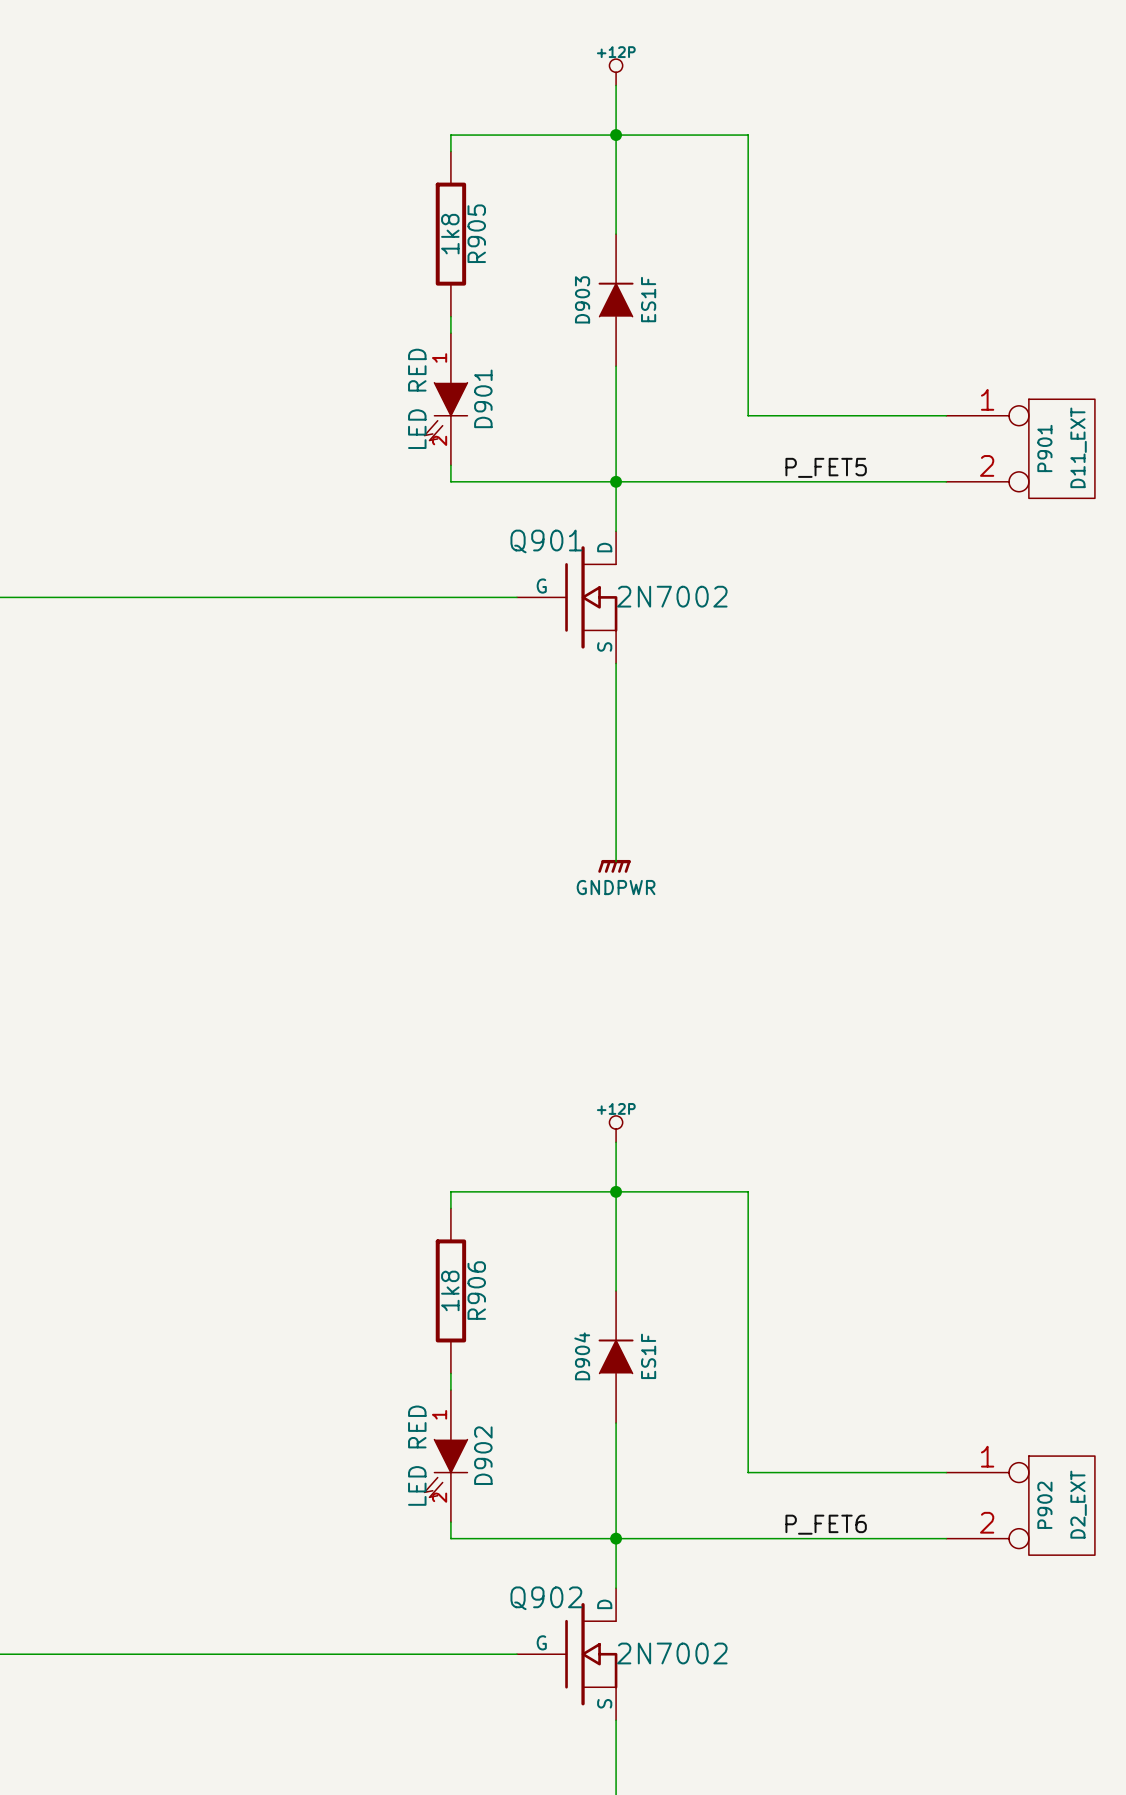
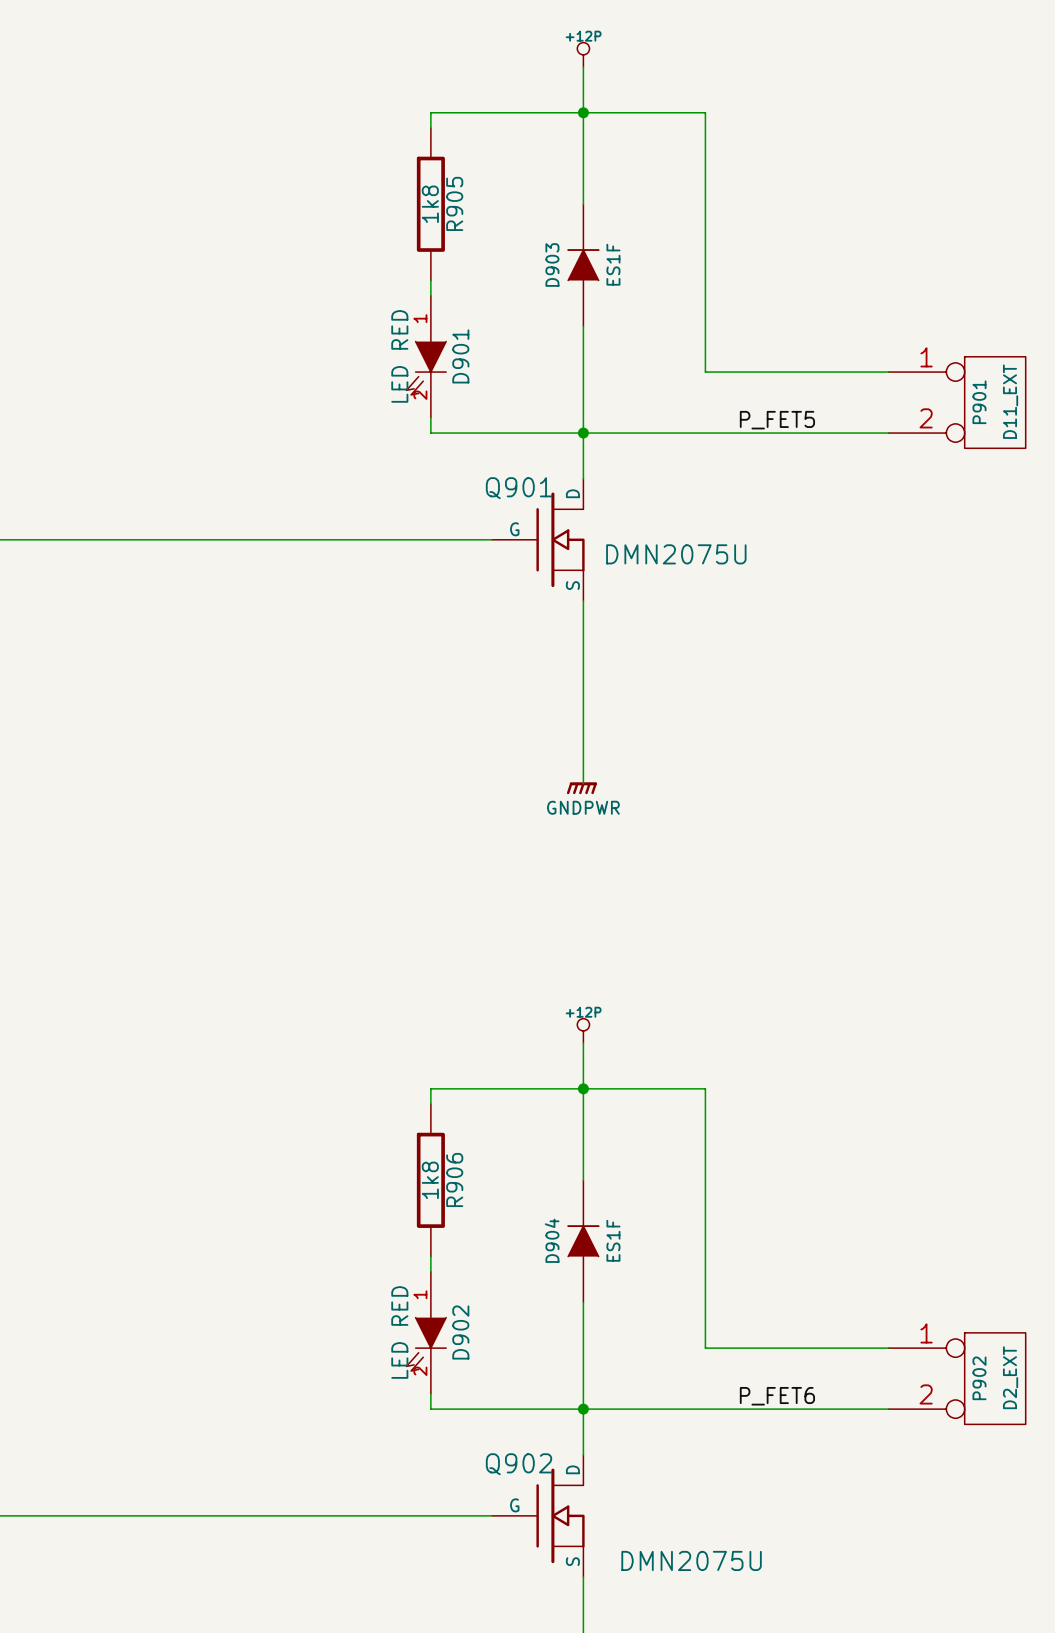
Q901 value: 2N7002 (672, 596) -> DMN2075U (676, 554)
Q902 value: 2N7002 (672, 1653) -> DMN2075U (691, 1560)

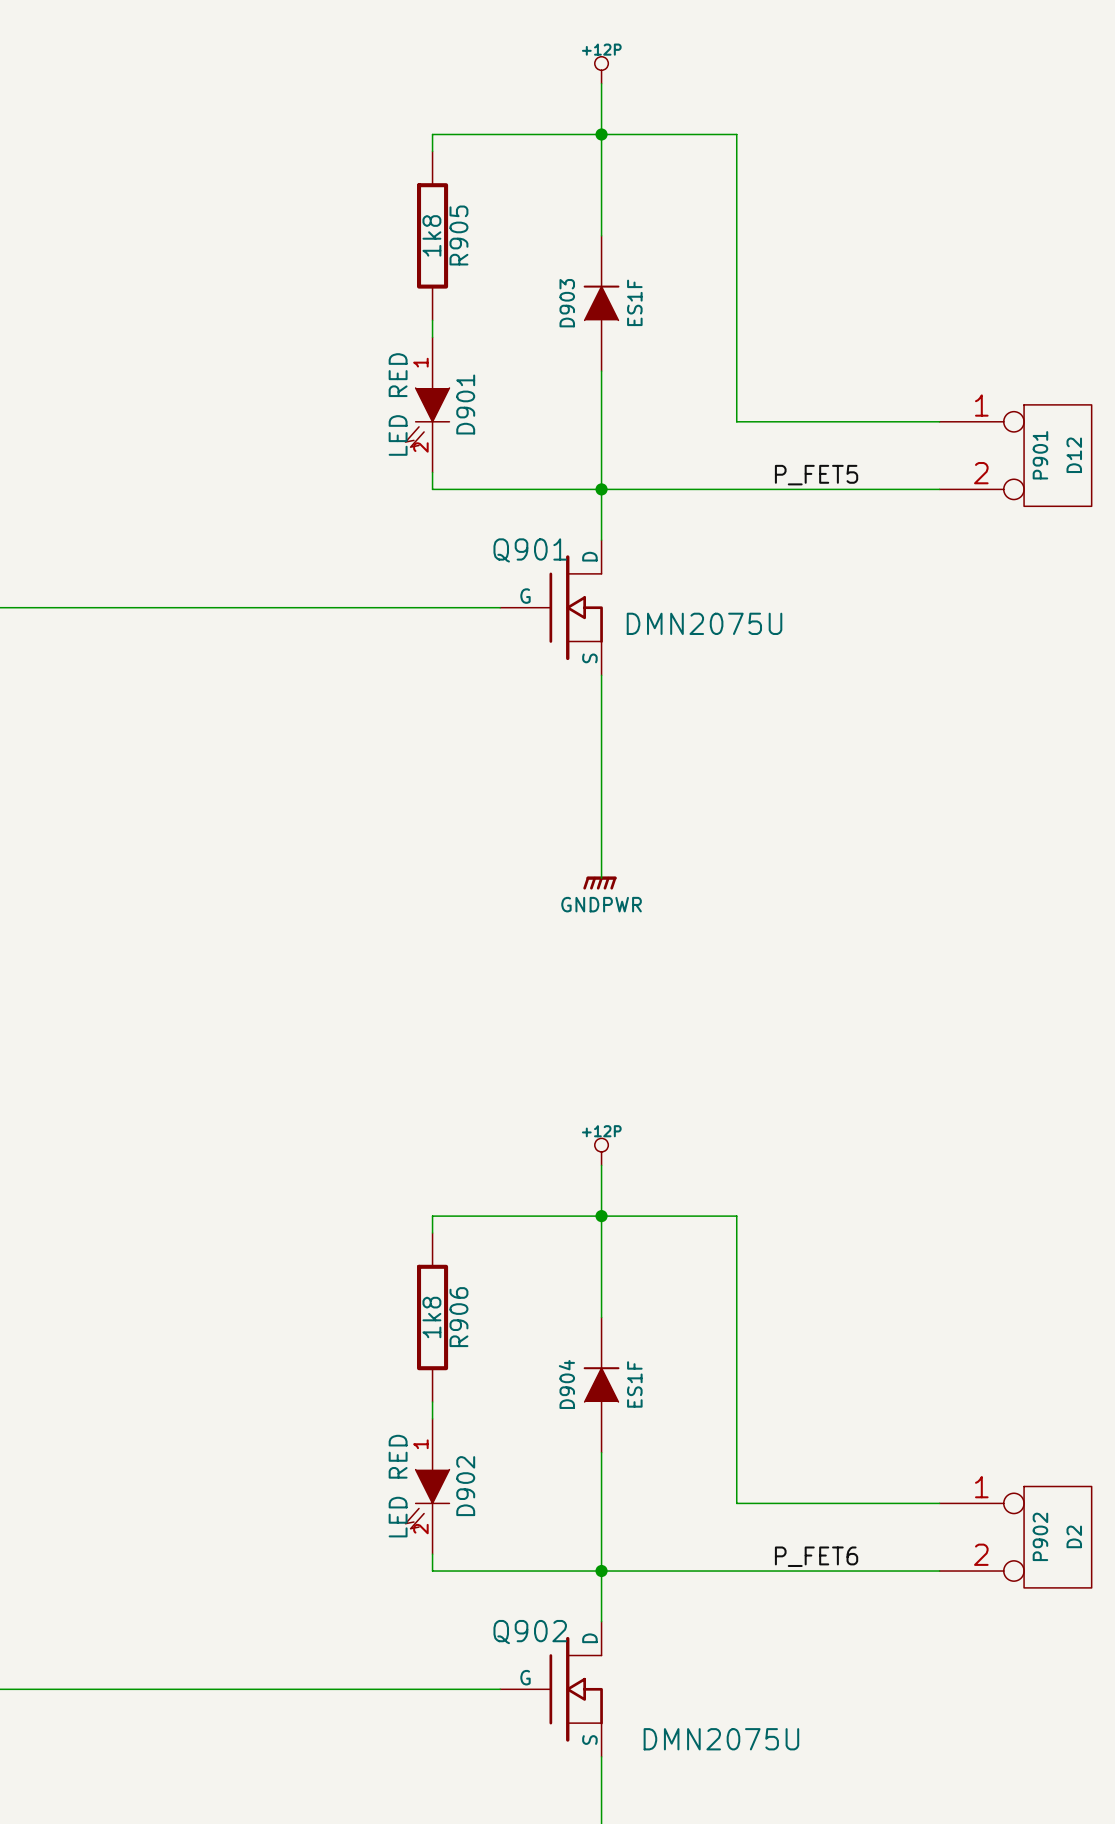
P901 value: D11_EXT (1010, 401) -> D12 (1074, 455)
P902 value: D2_EXT (1010, 1377) -> D2 (1074, 1536)

